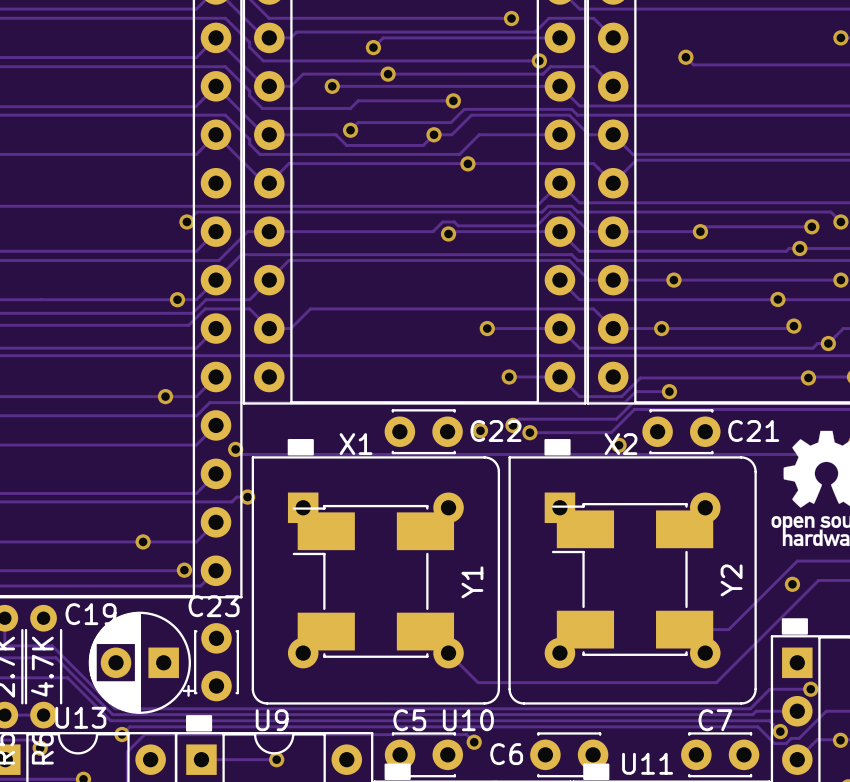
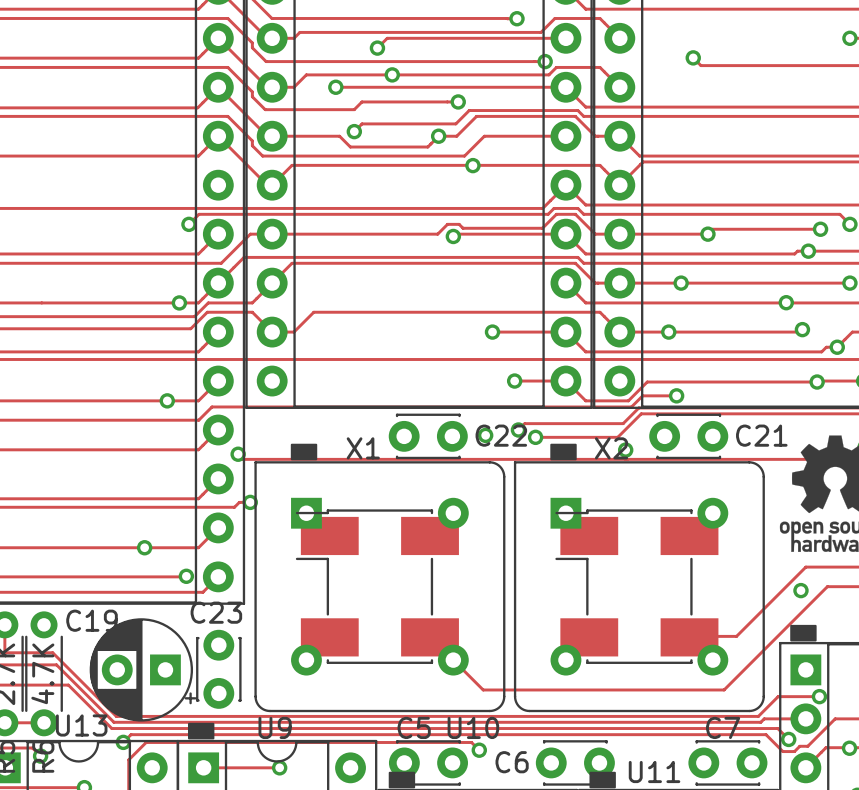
X1 footprint: [251, 456, 501, 705] -> [254, 461, 506, 713]
X2 footprint: [508, 456, 757, 705] -> [513, 461, 765, 713]
Y2: (632, 579) -> none
Y1: (373, 581) -> none

